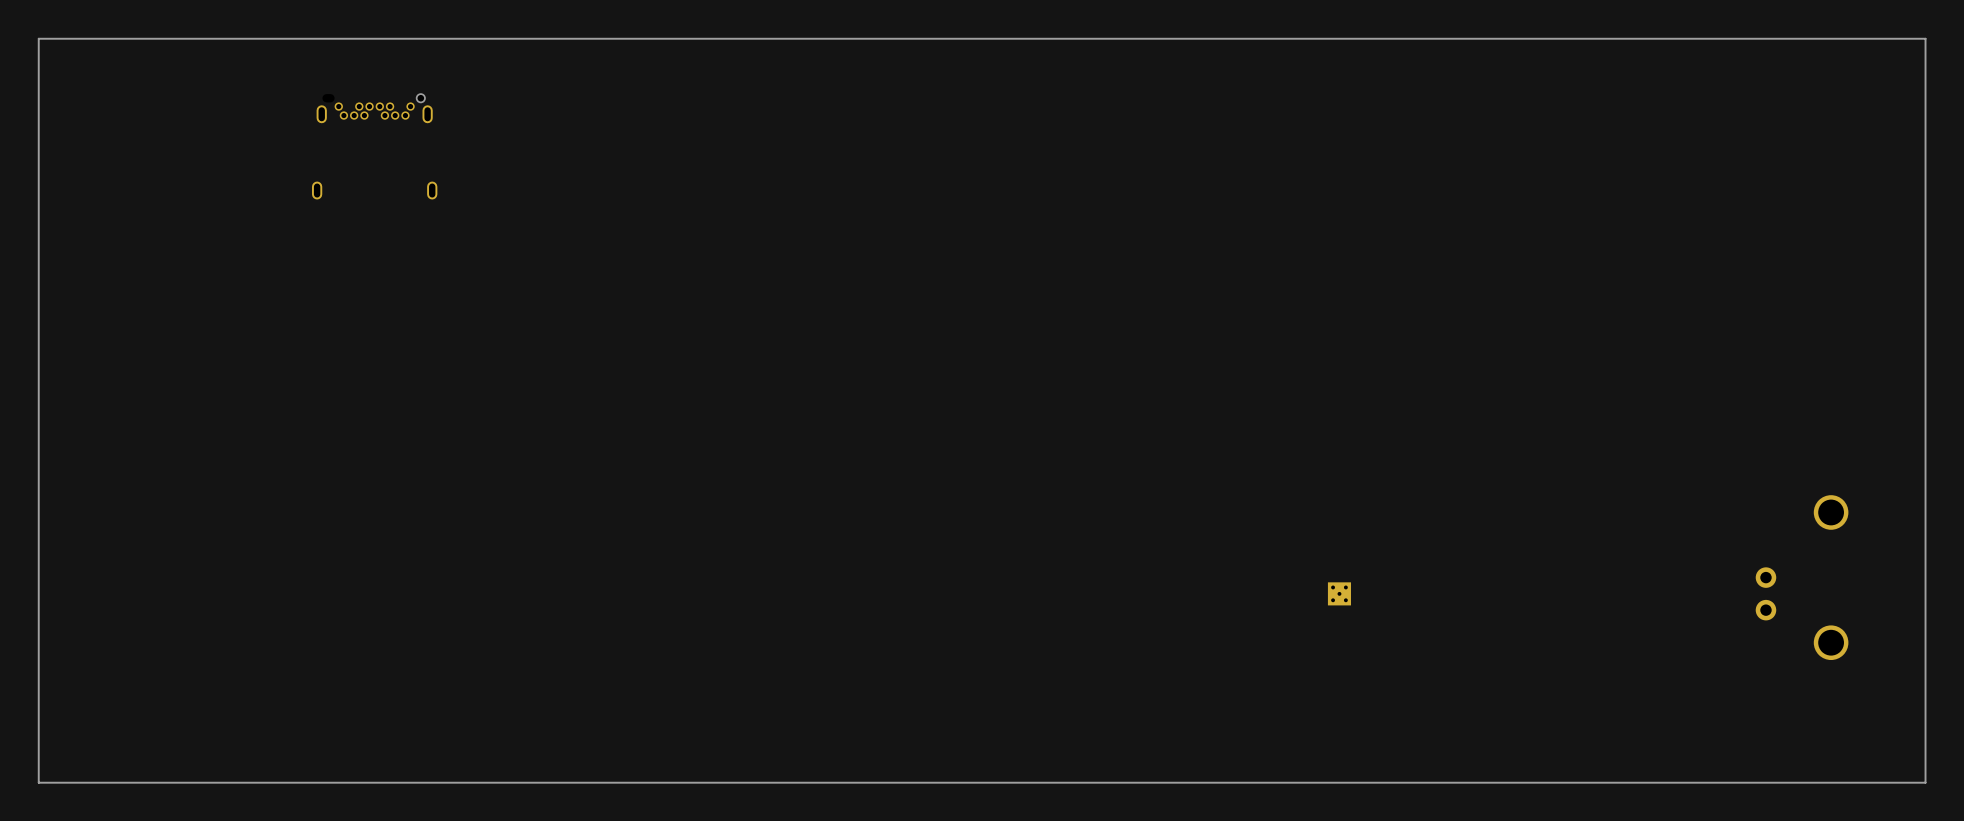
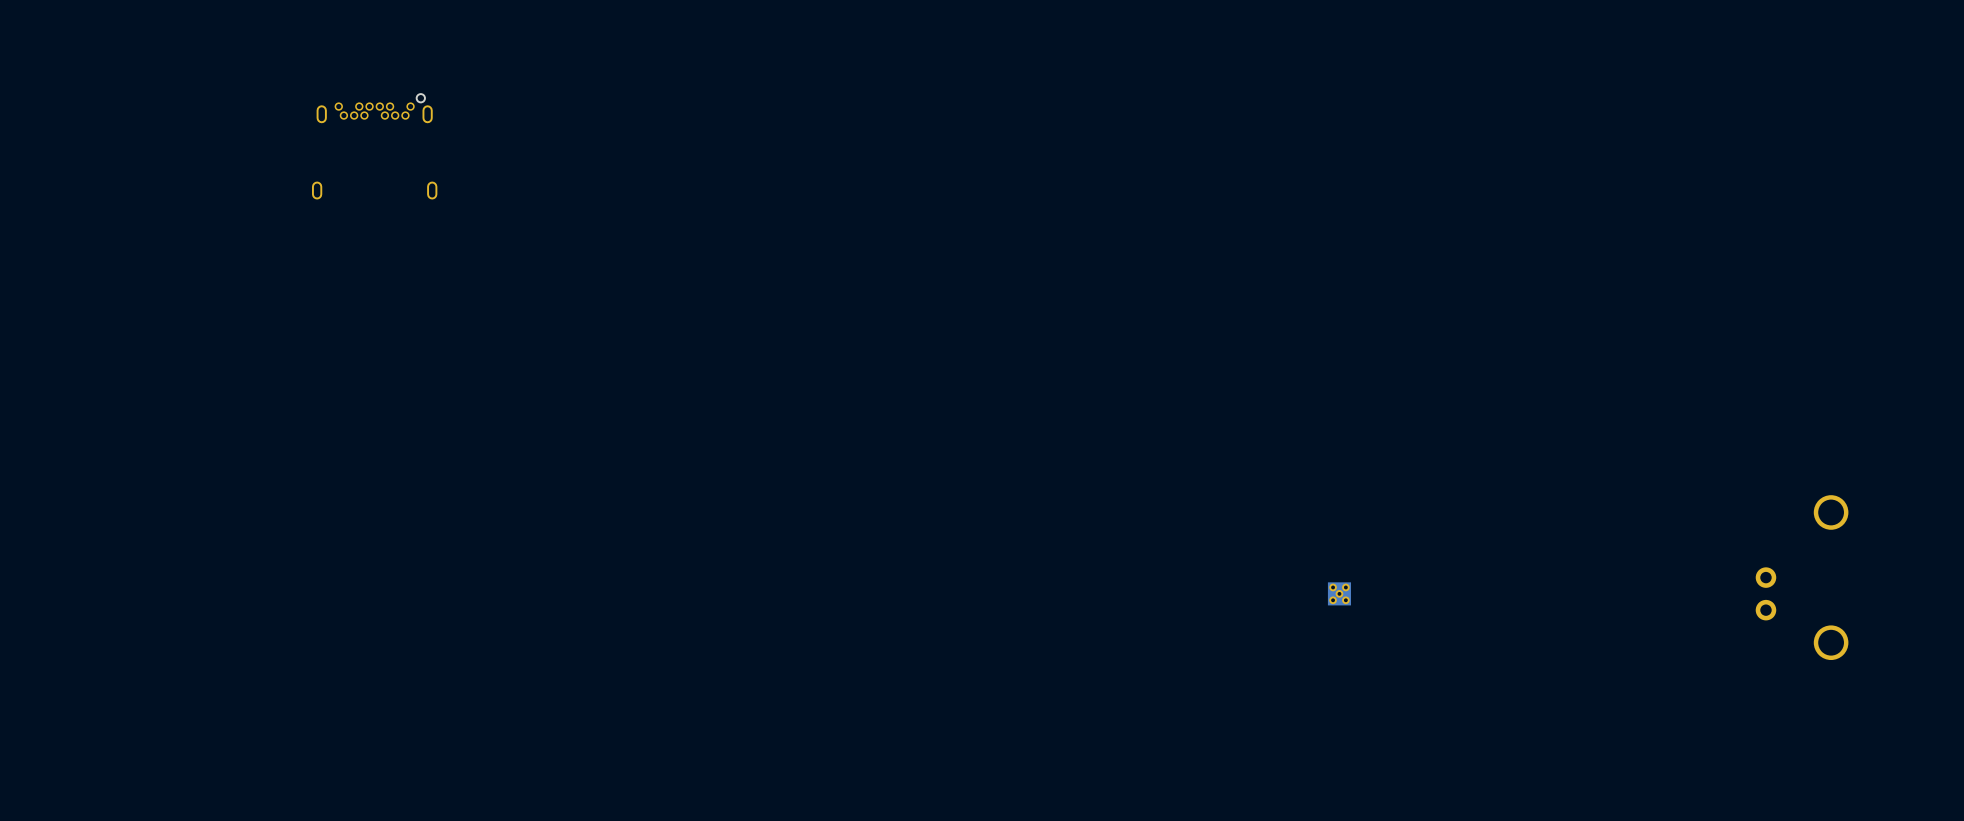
board edge: (1925, 38) (38, 38) (38, 782) (1925, 782) (1925, 38) -> none

